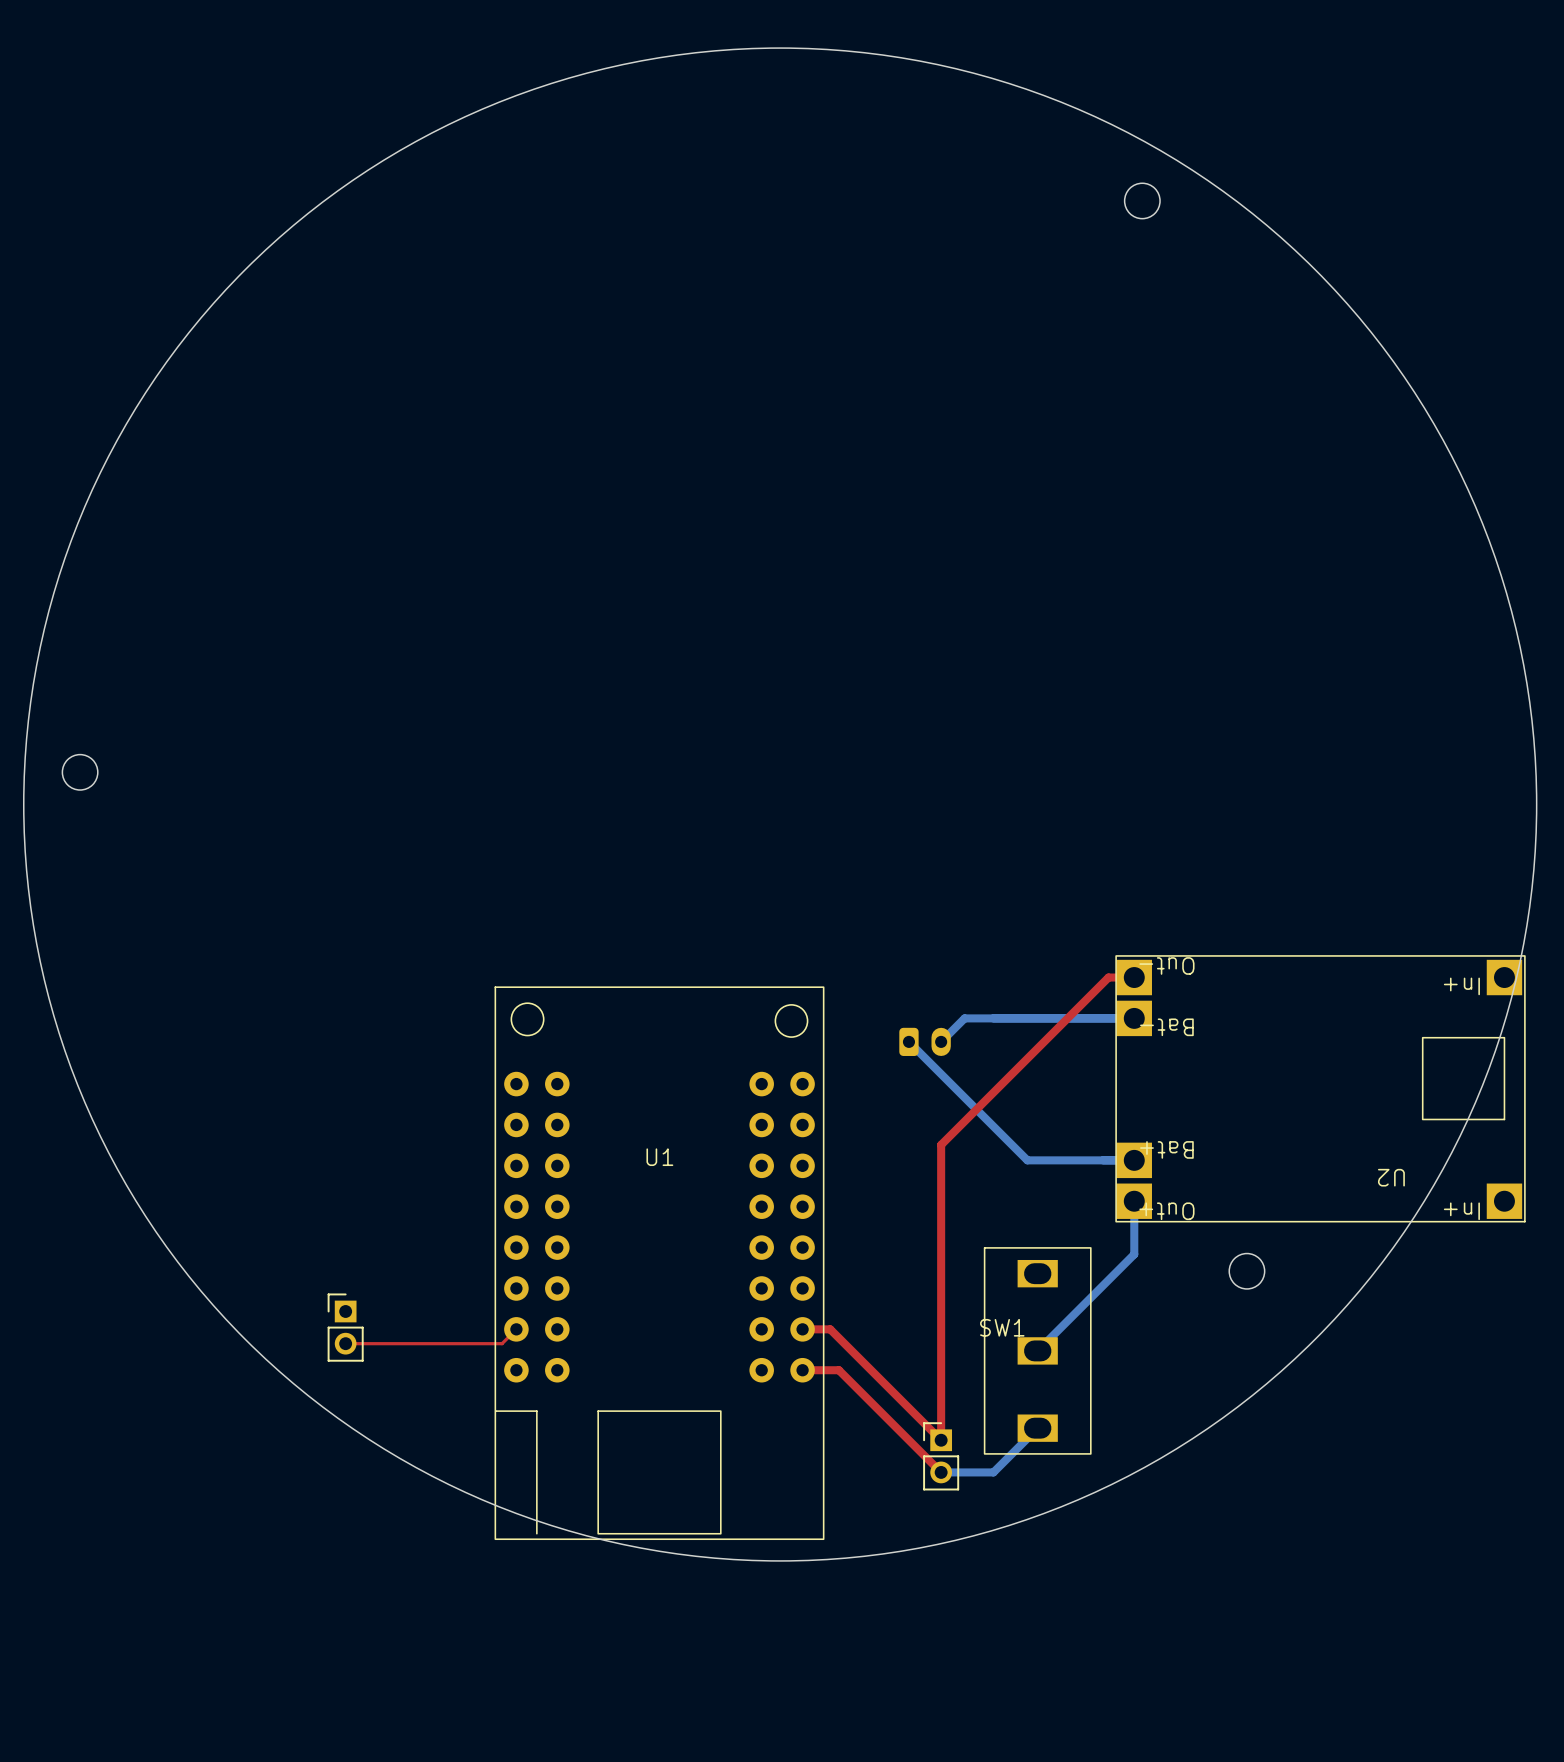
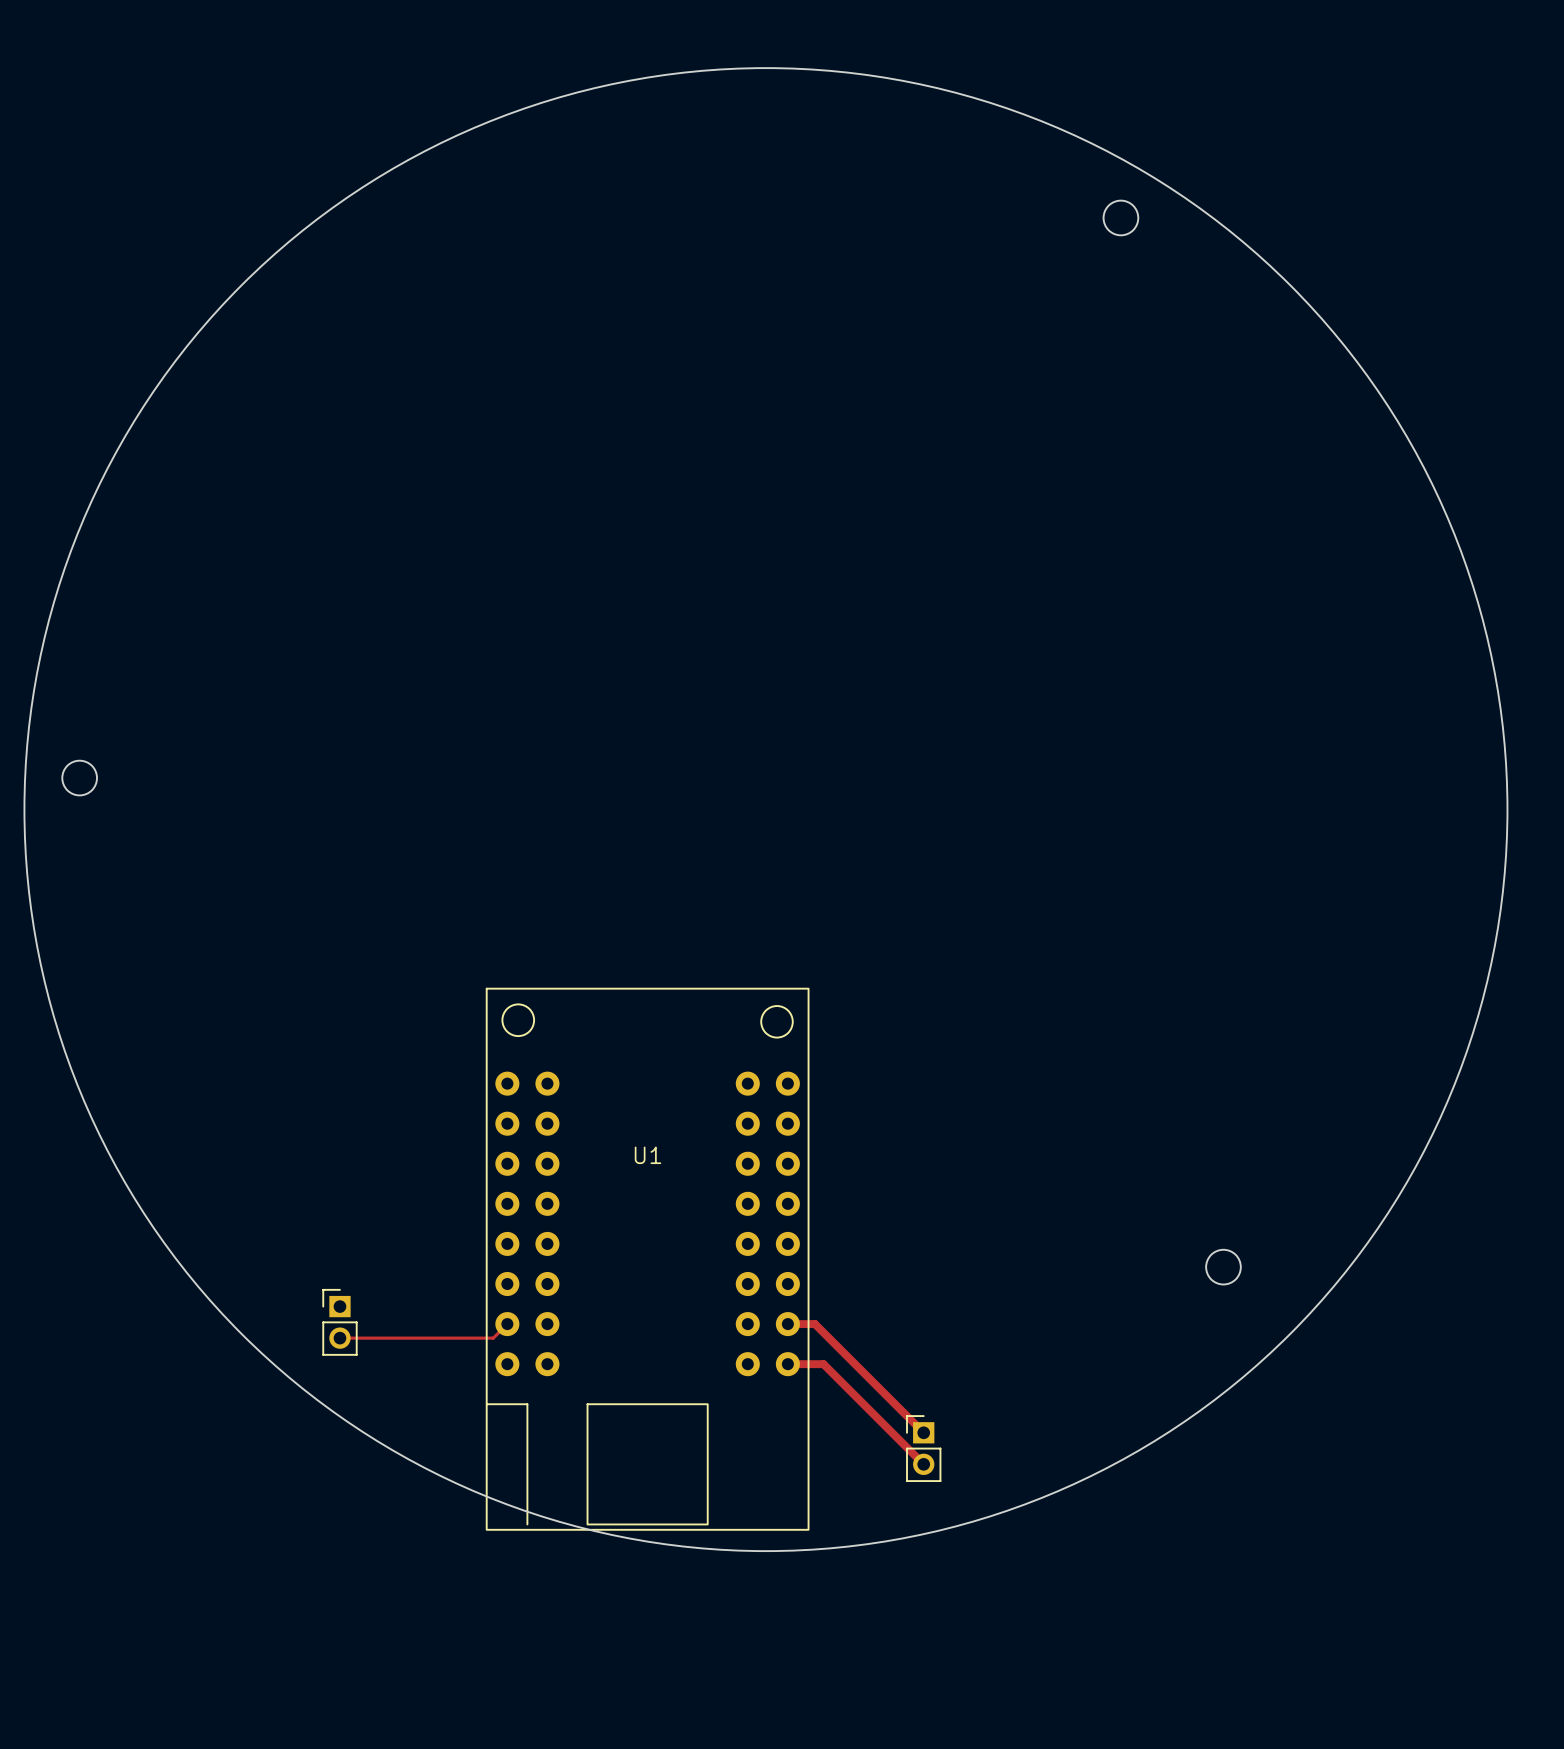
top track: (1134, 977) (1108, 977) (941, 1144) (941, 1440) -> none
bottom track: (1134, 1018) (964, 1018) (941, 1041) -> none
bottom track: (908, 1041) (1027, 1160) (1134, 1160) -> none
part: (925, 1041) -> none
U2: (1320, 1088) -> none
bottom track: (1134, 1201) (1134, 1254) (1037, 1350) -> none
SW1: (1037, 1350) -> none
bottom track: (1037, 1428) (993, 1472) (941, 1472) -> none

